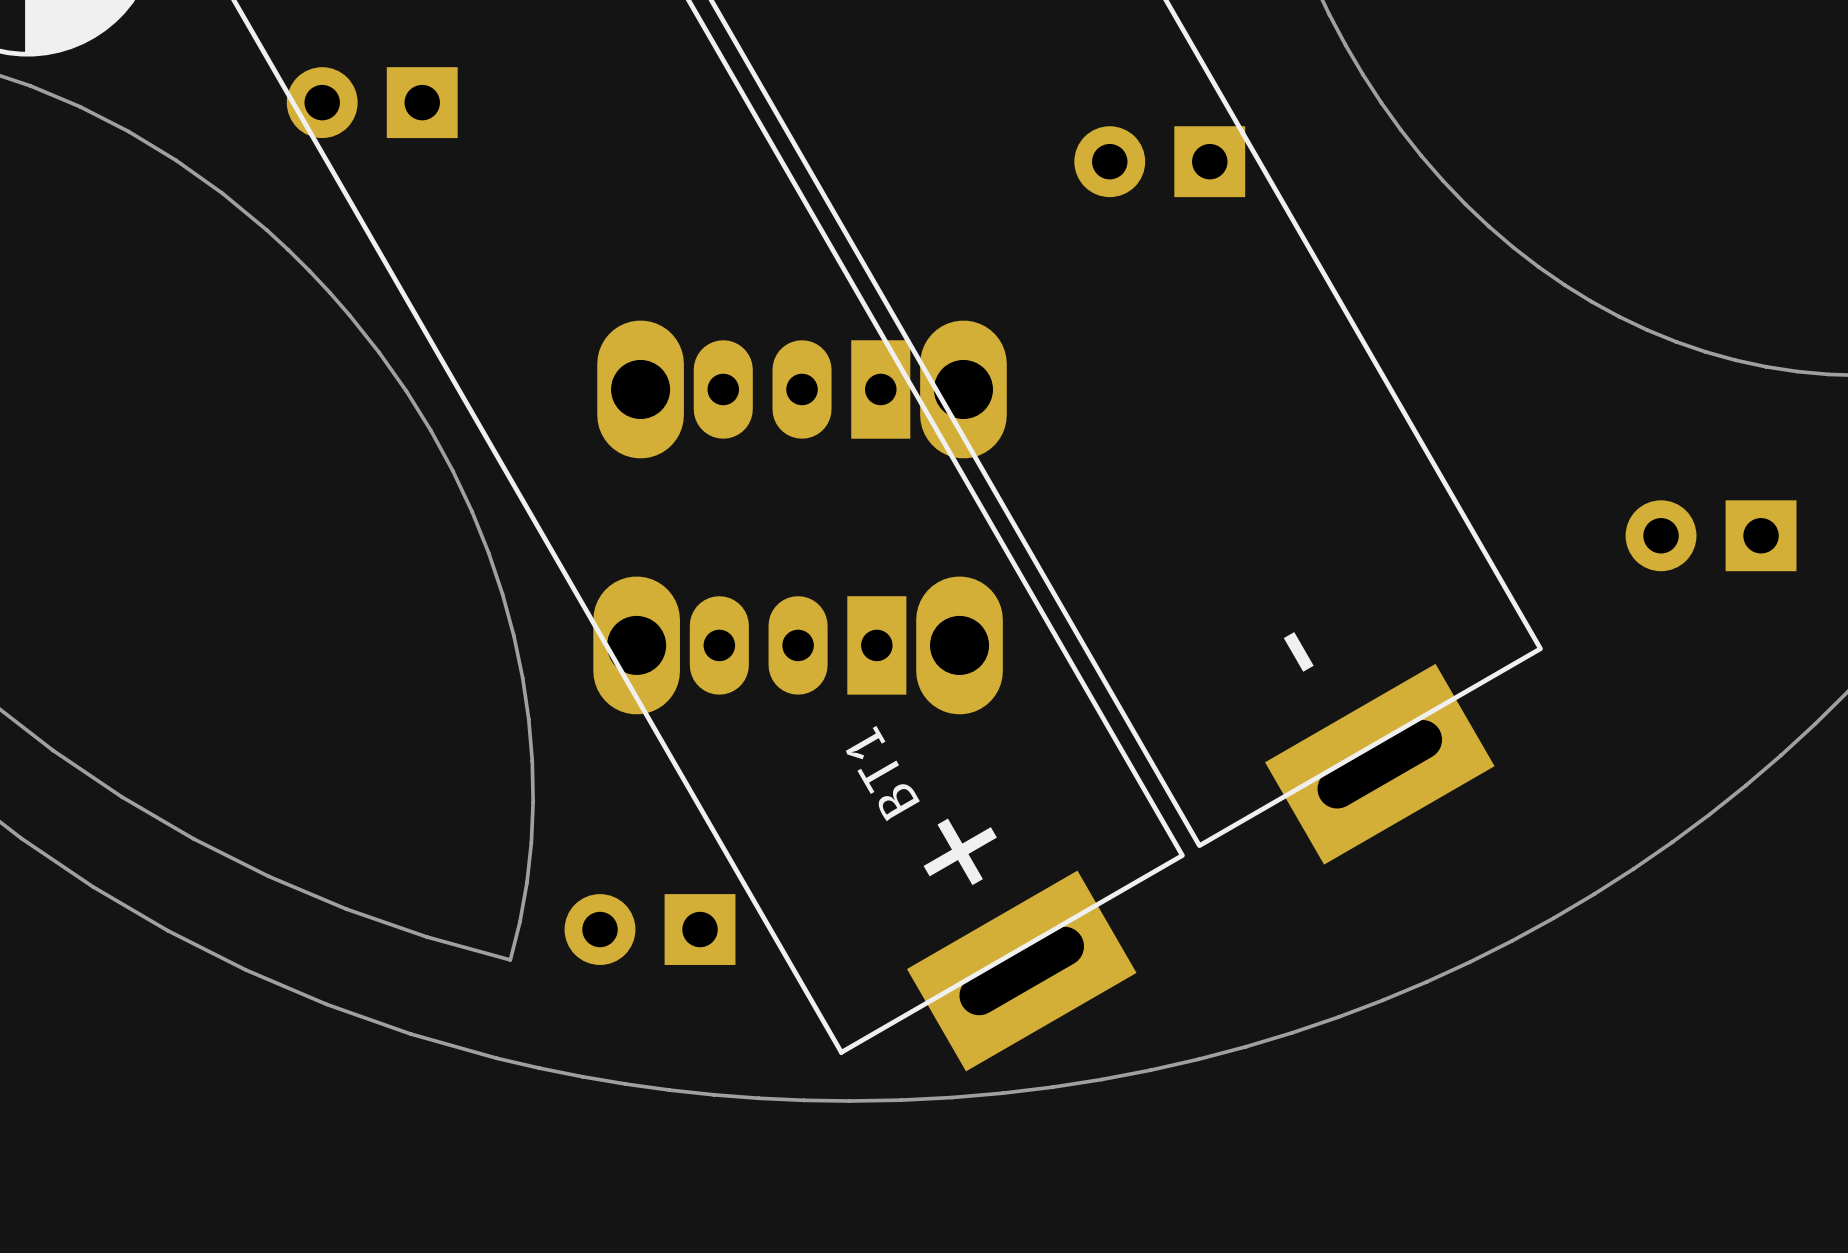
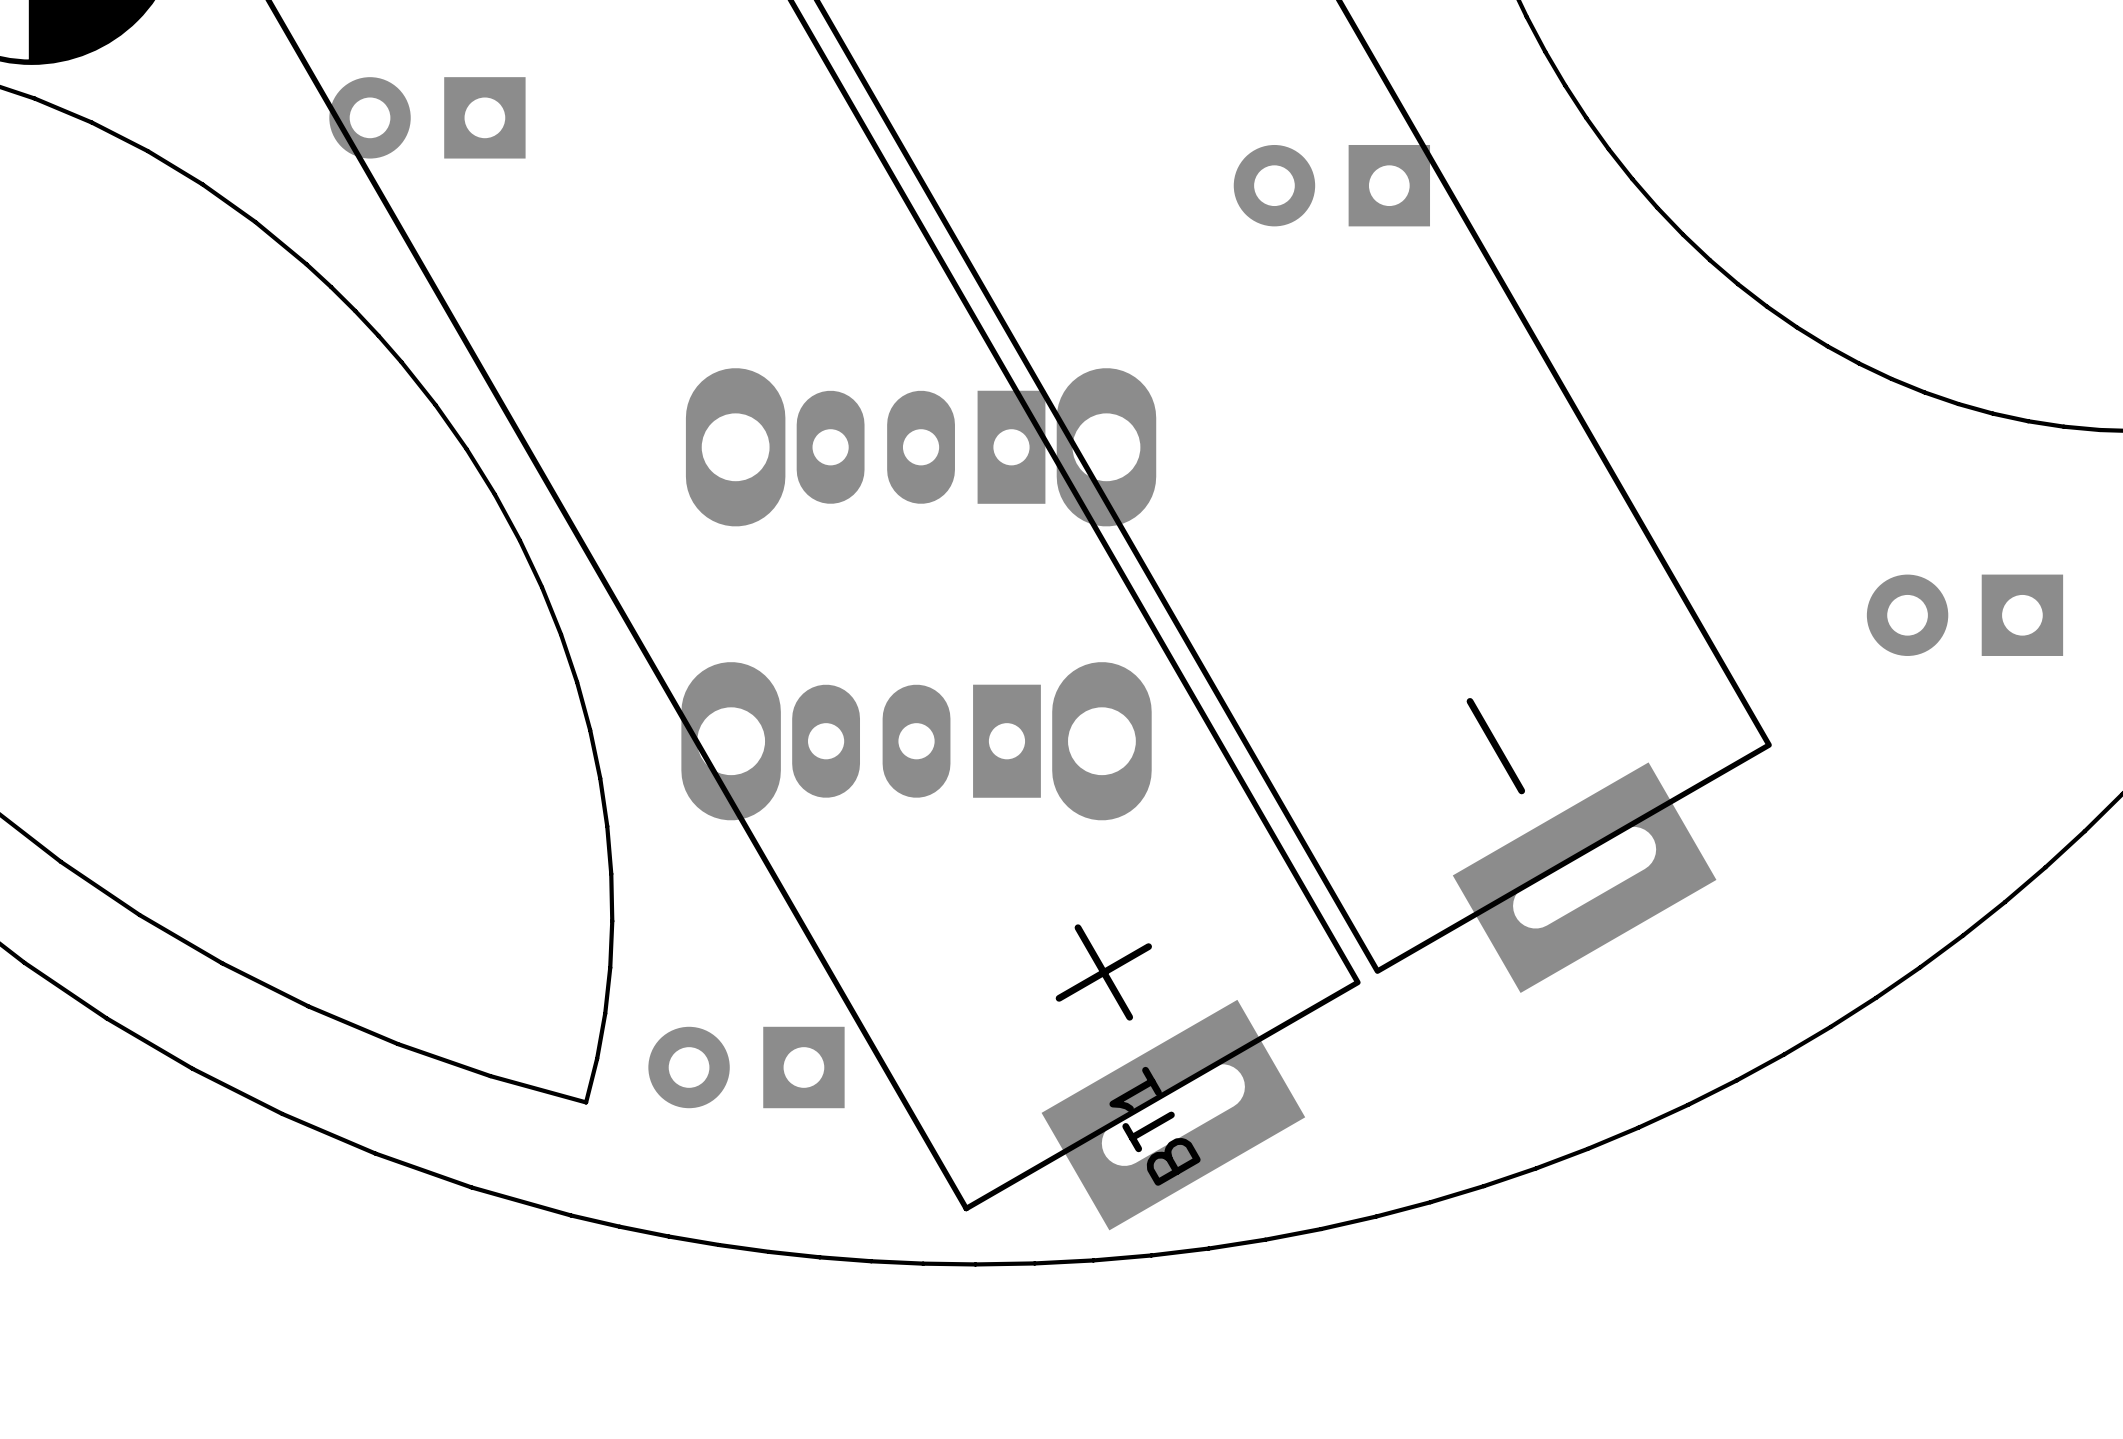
BT1 name position: BT1 (882, 773) -> BT1 (1155, 1126)

